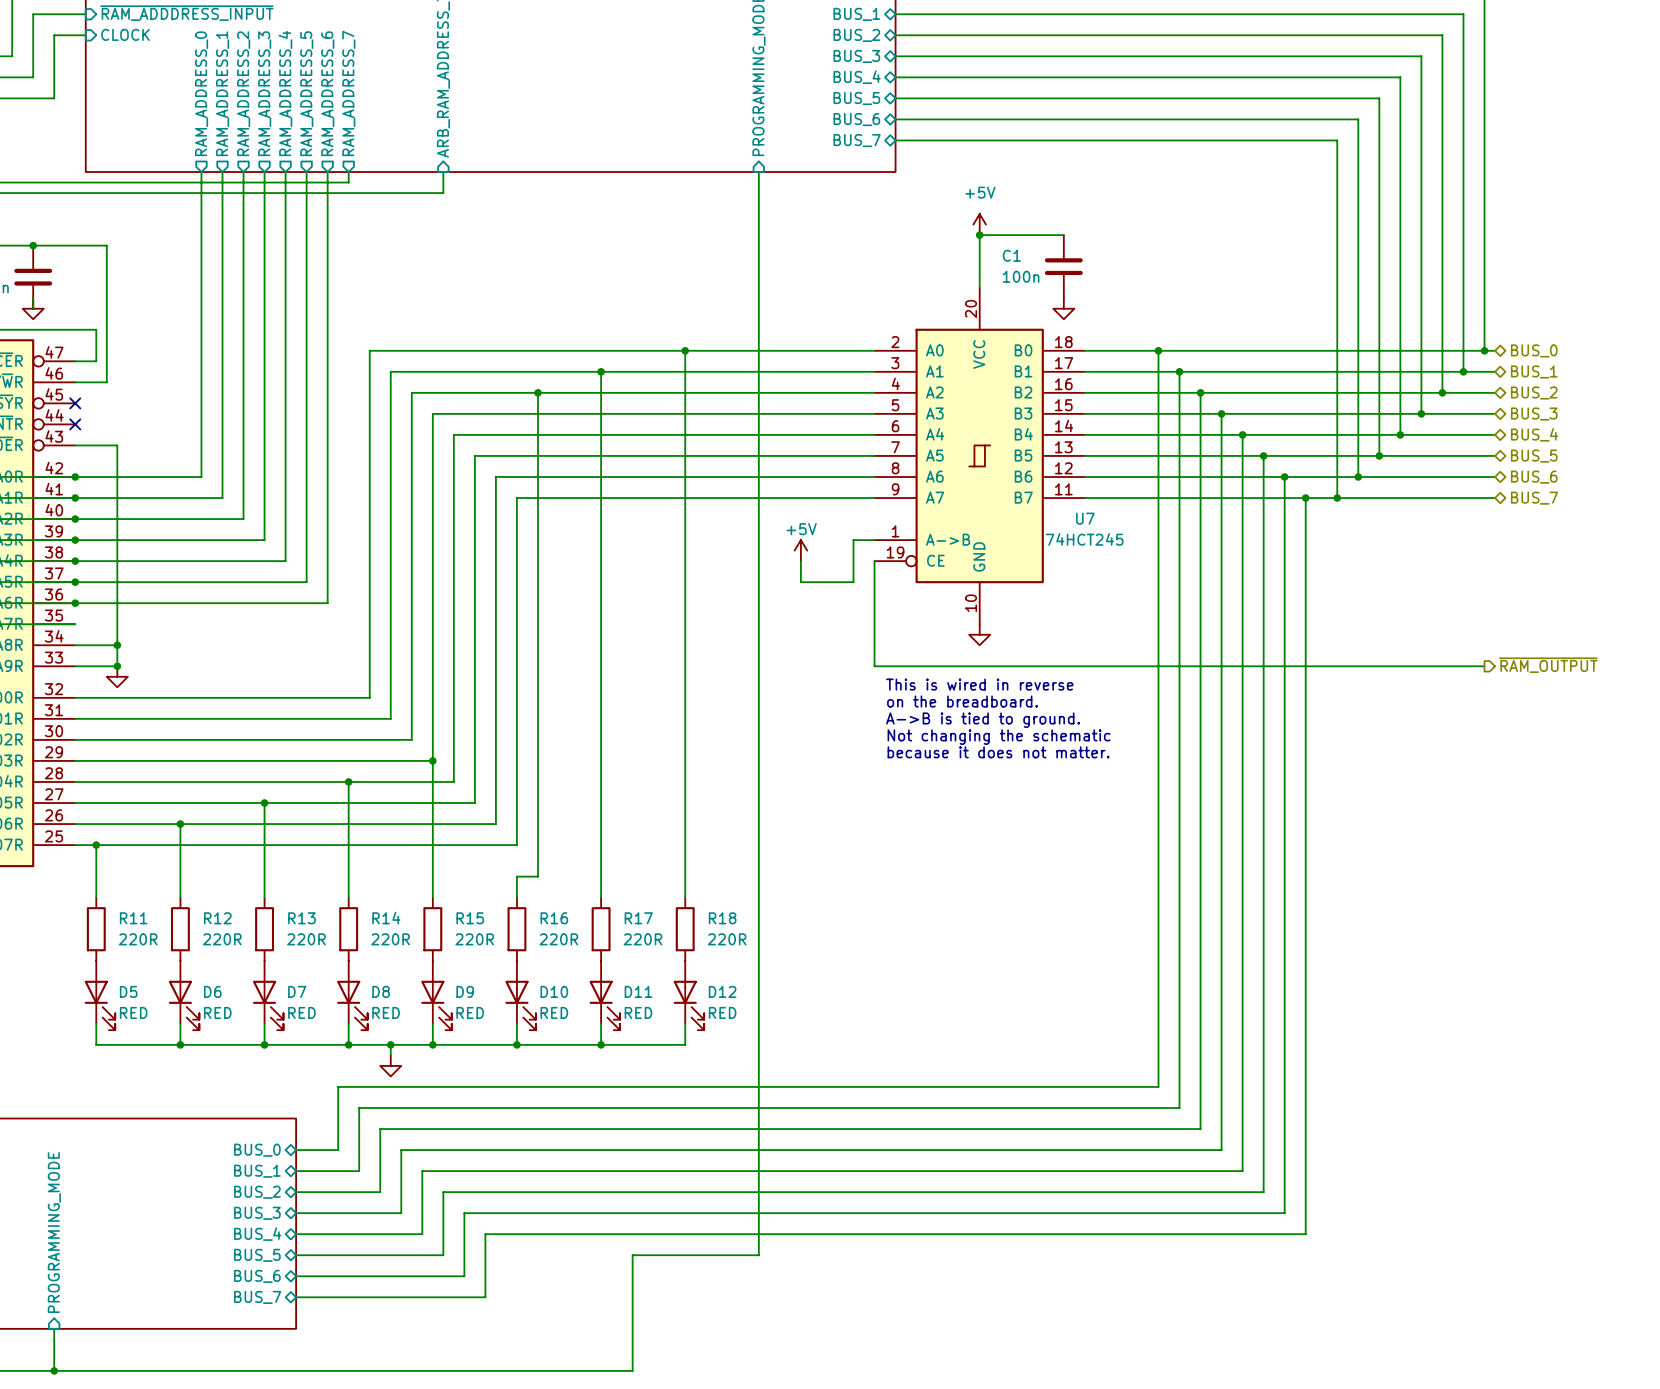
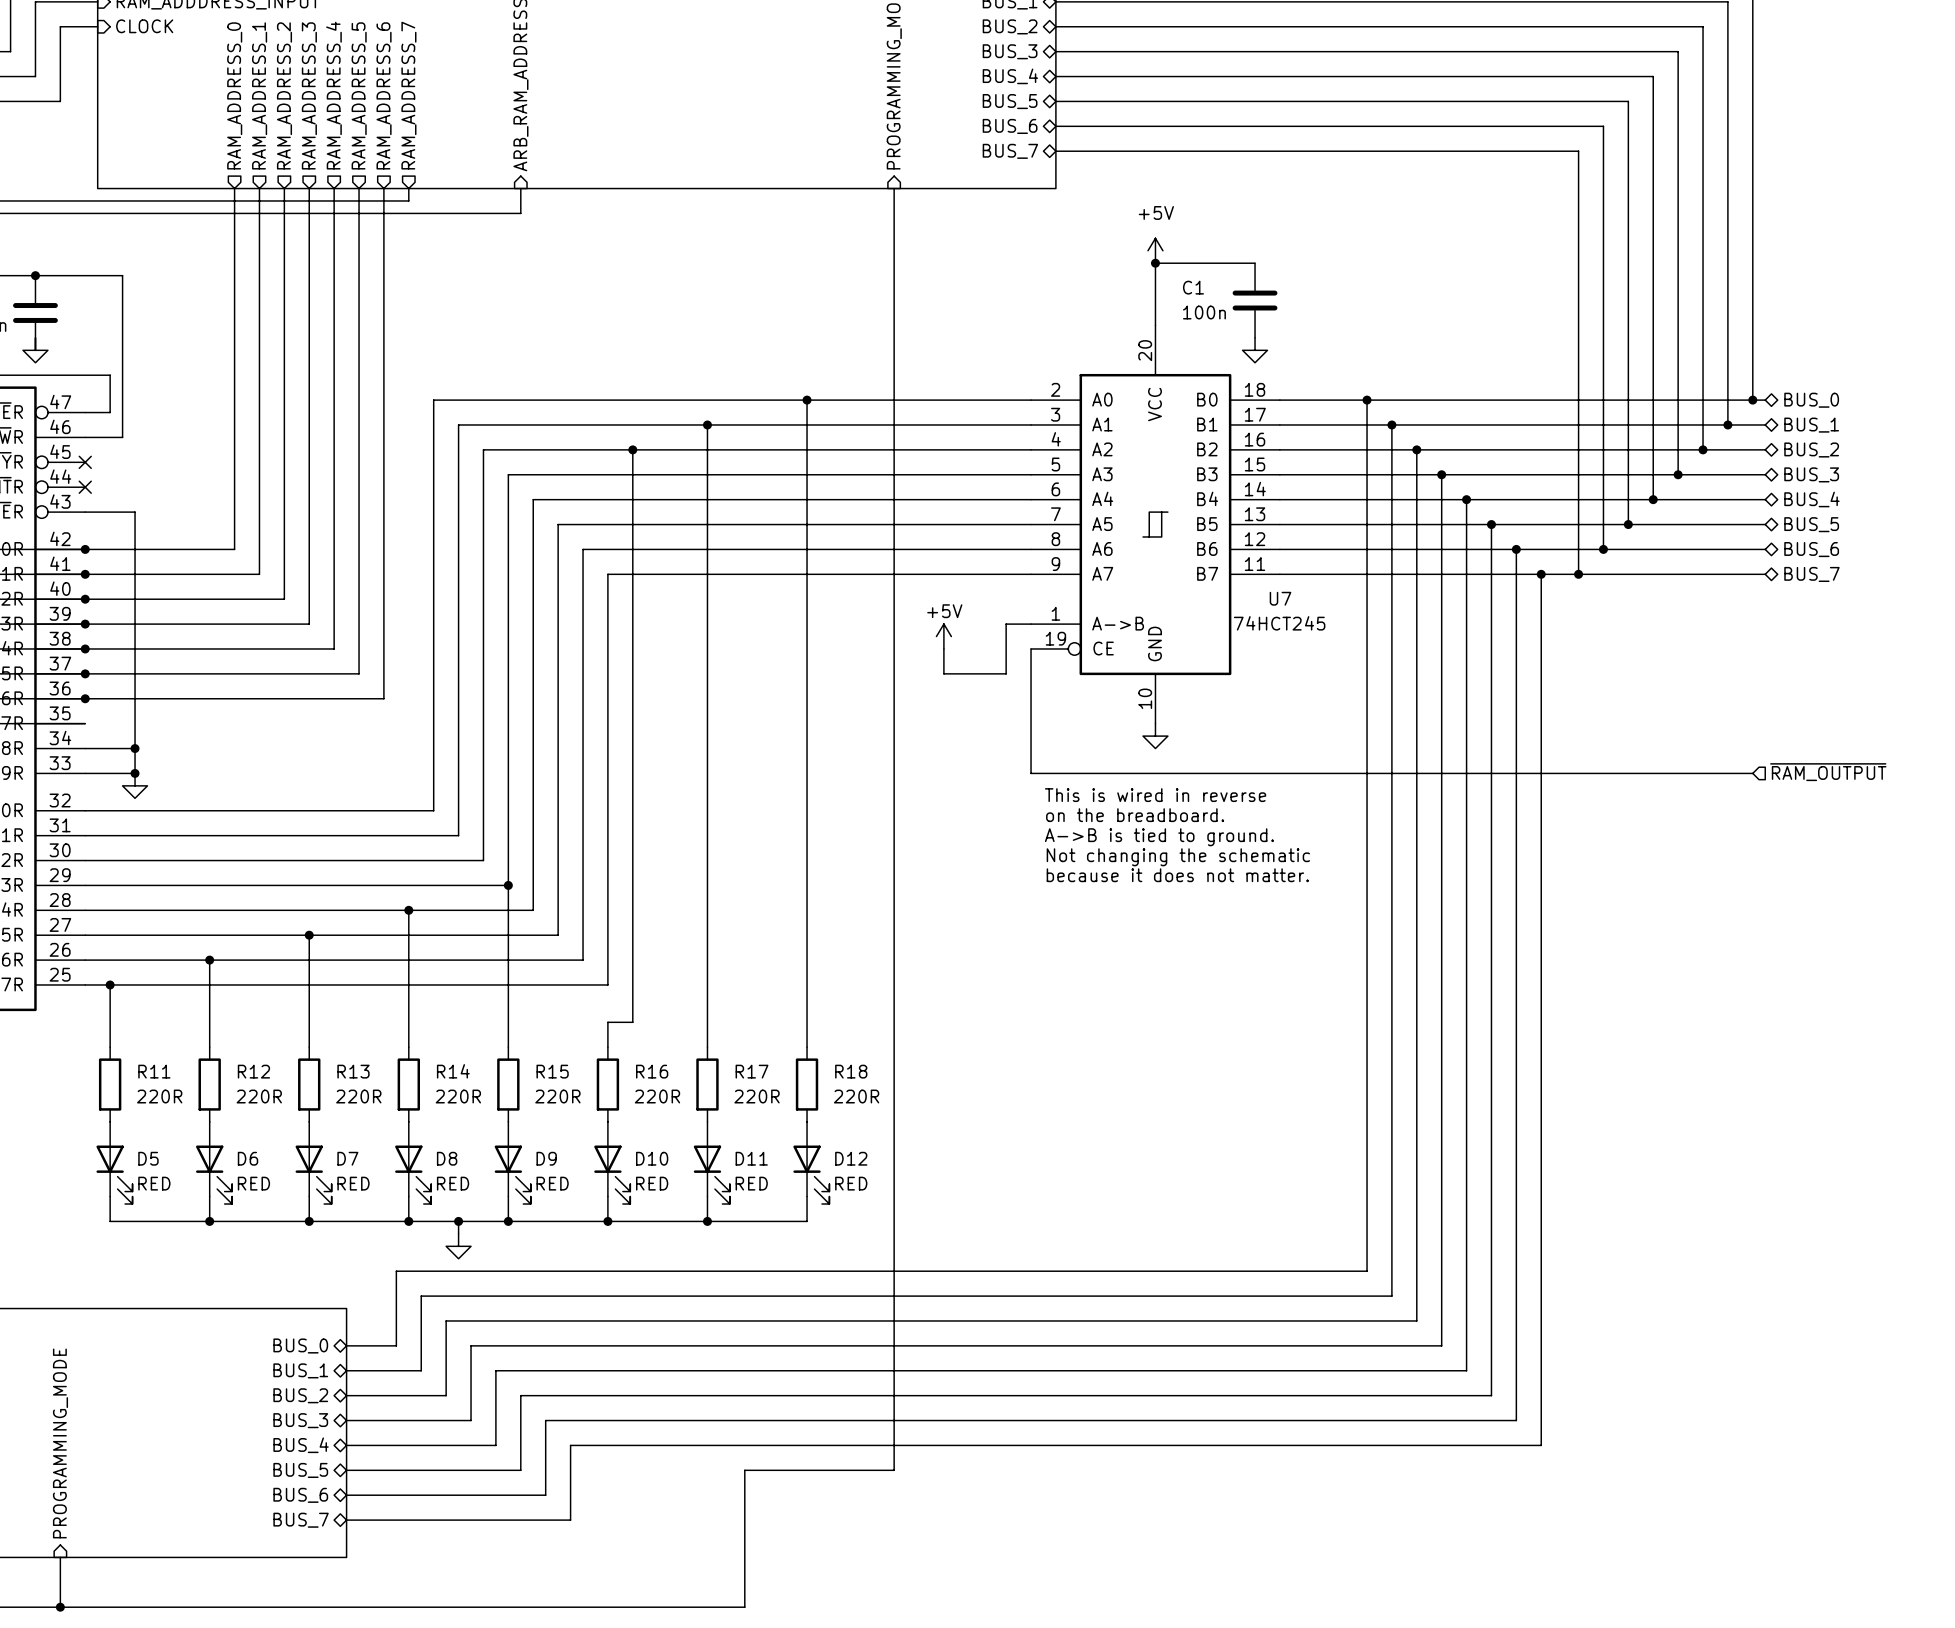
hierarchical label shape: output (1548, 665) -> input (1828, 772)

